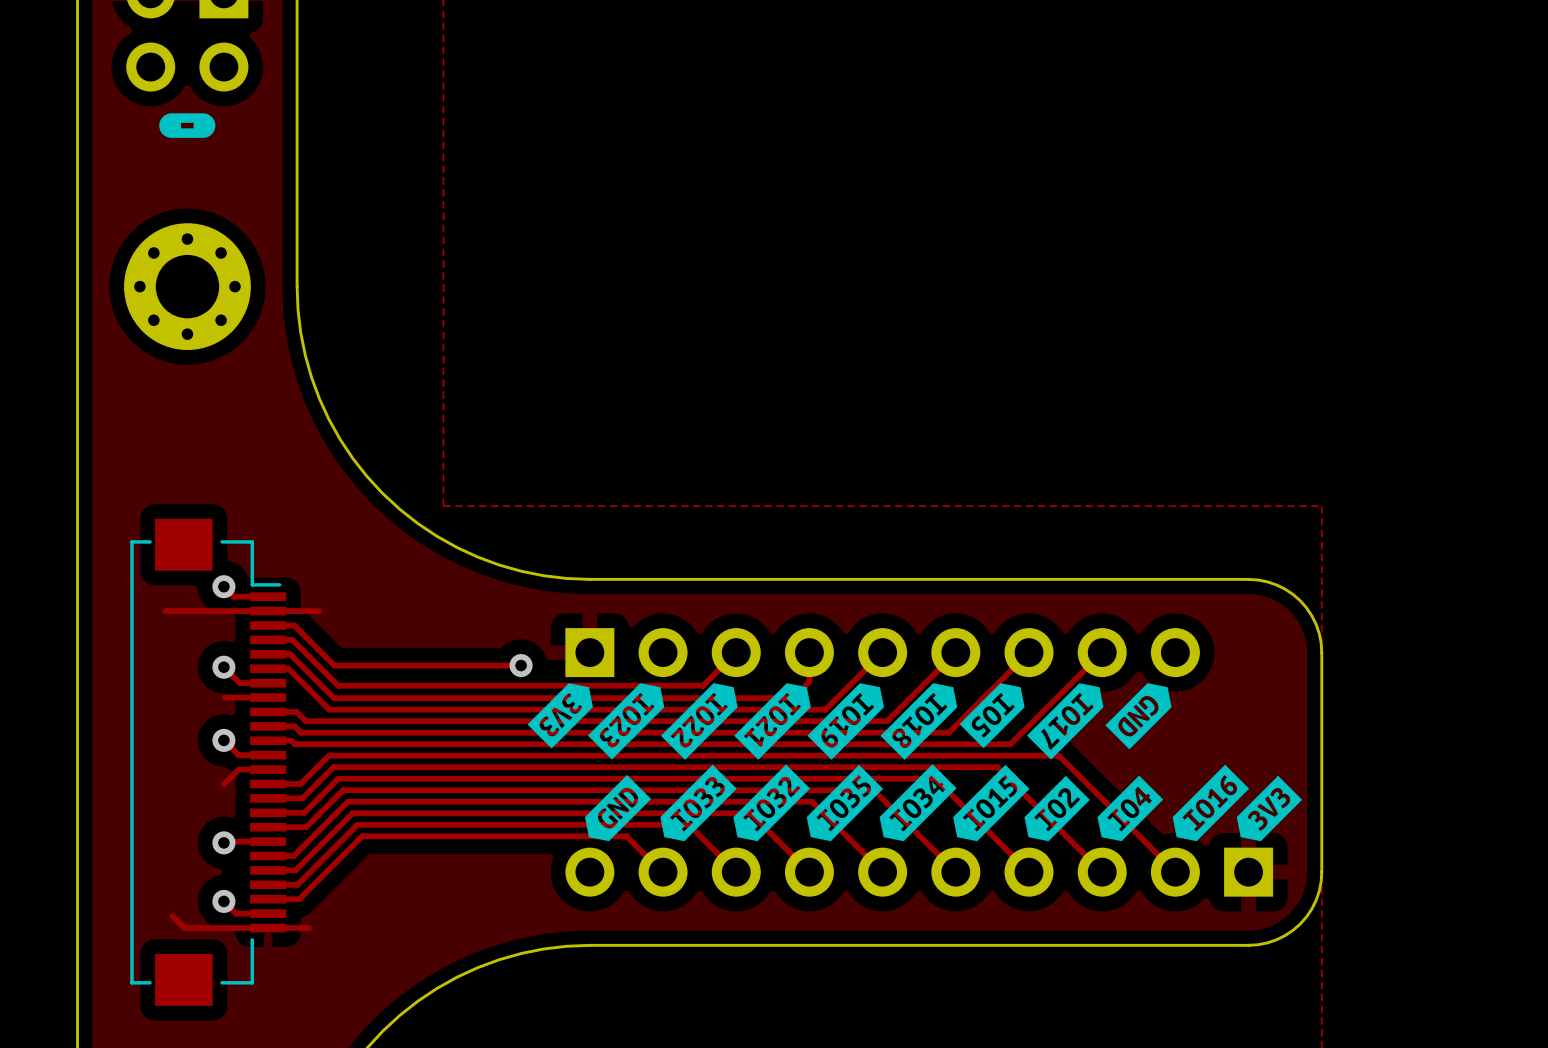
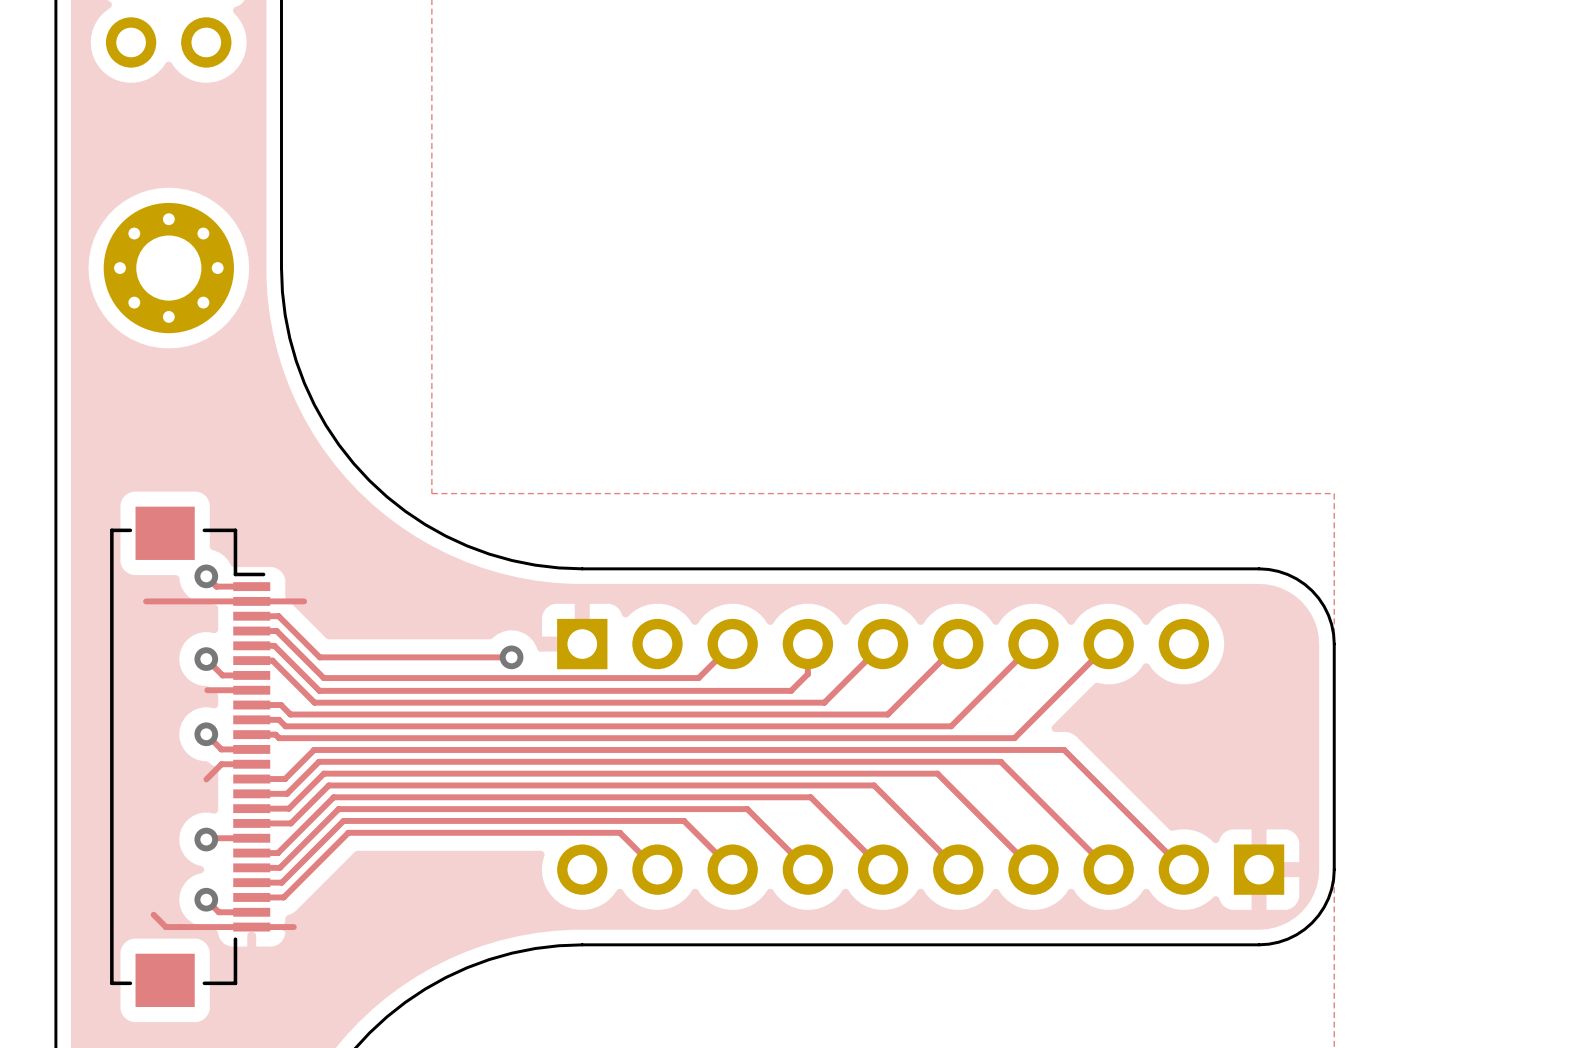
drawing: [159, 113, 216, 138] -> none
drawing: [527, 683, 1303, 842] -> none

